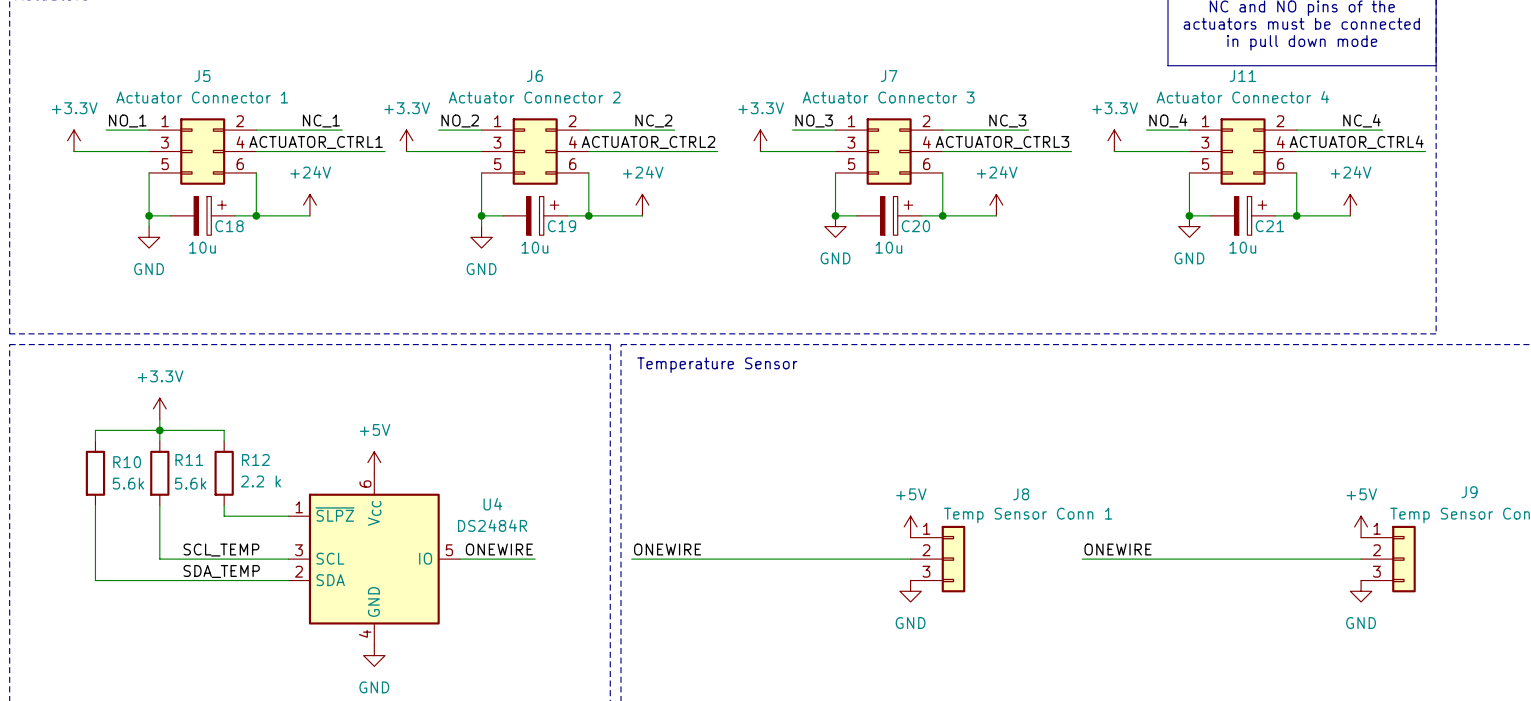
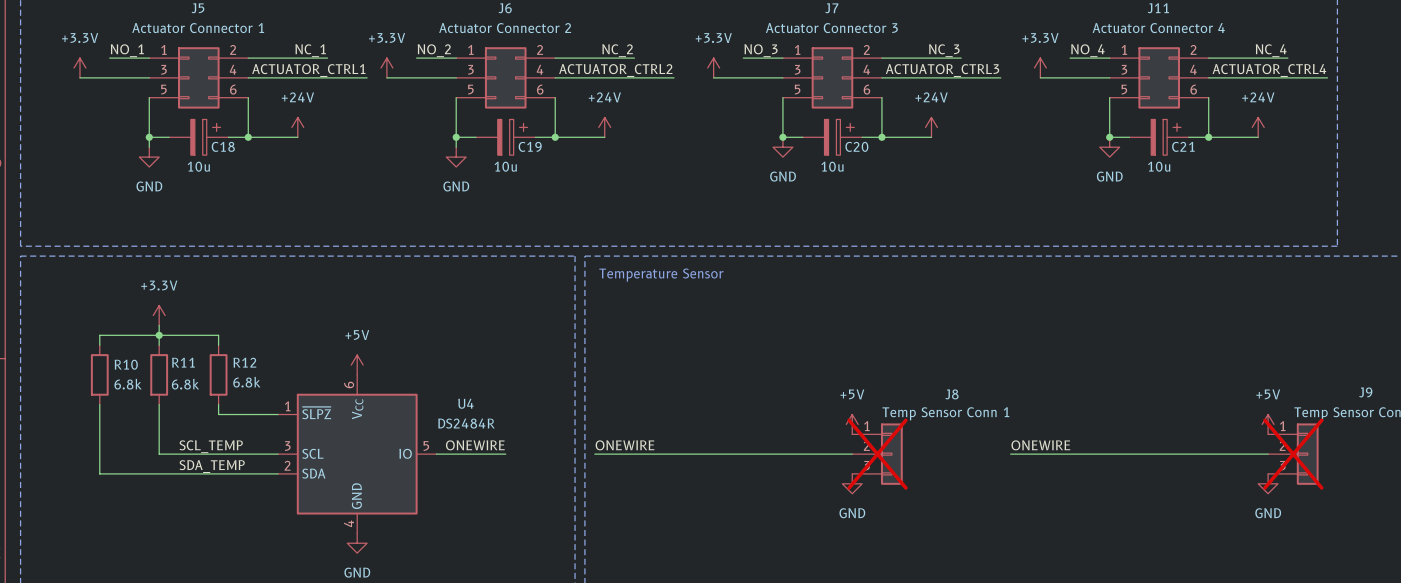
R12 value: 2.2 k (260, 481) -> 6.8k (246, 382)
R10 value: 5.6k (128, 483) -> 6.8k (128, 384)
R11 value: 5.6k (190, 483) -> 6.8k (185, 384)
J8 do-not-place cross: none -> (877, 454)
J9 do-not-place cross: none -> (1293, 454)

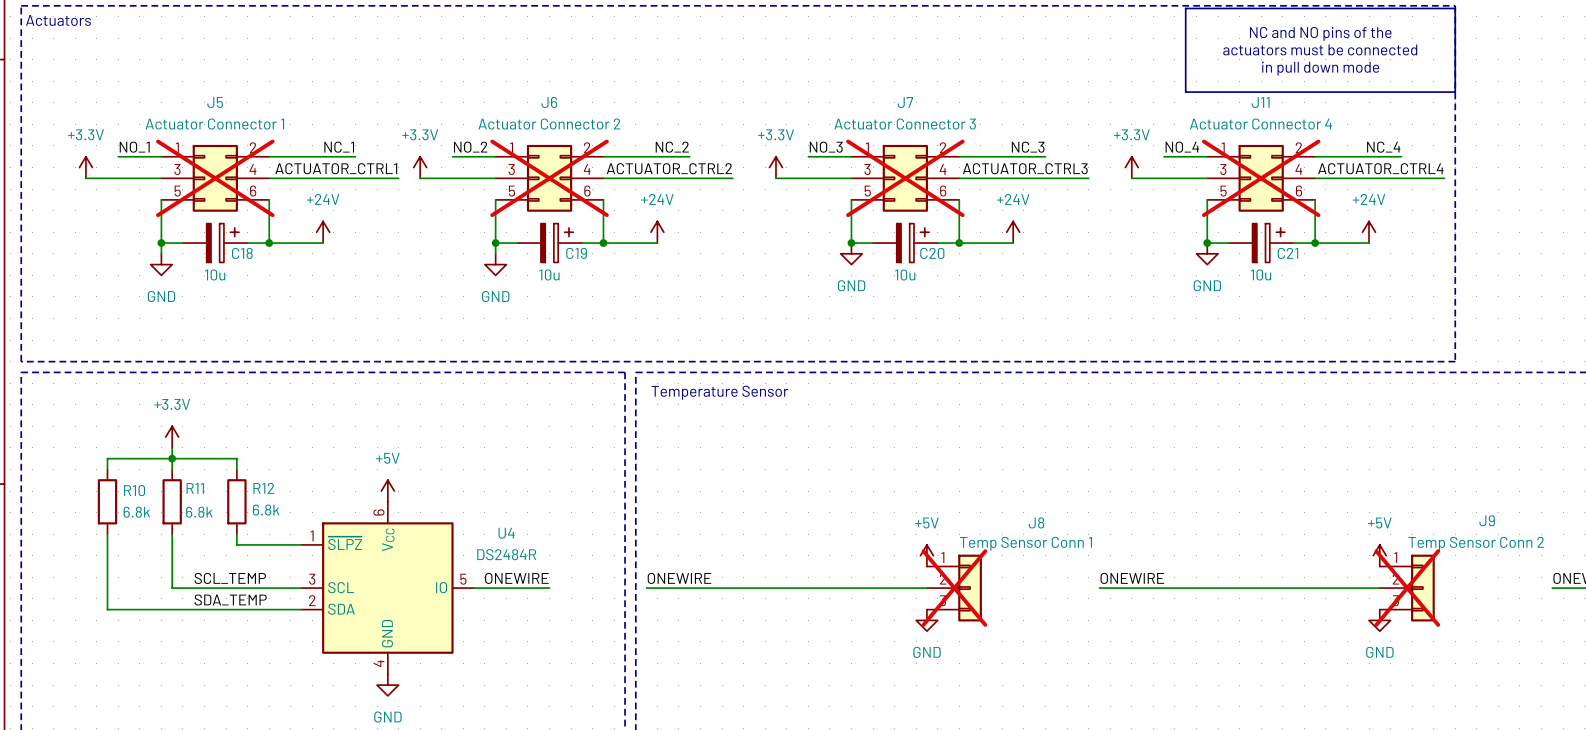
J5 do-not-place cross: none -> (215, 178)
J6 do-not-place cross: none -> (549, 178)
J7 do-not-place cross: none -> (905, 178)
J11 do-not-place cross: none -> (1261, 178)

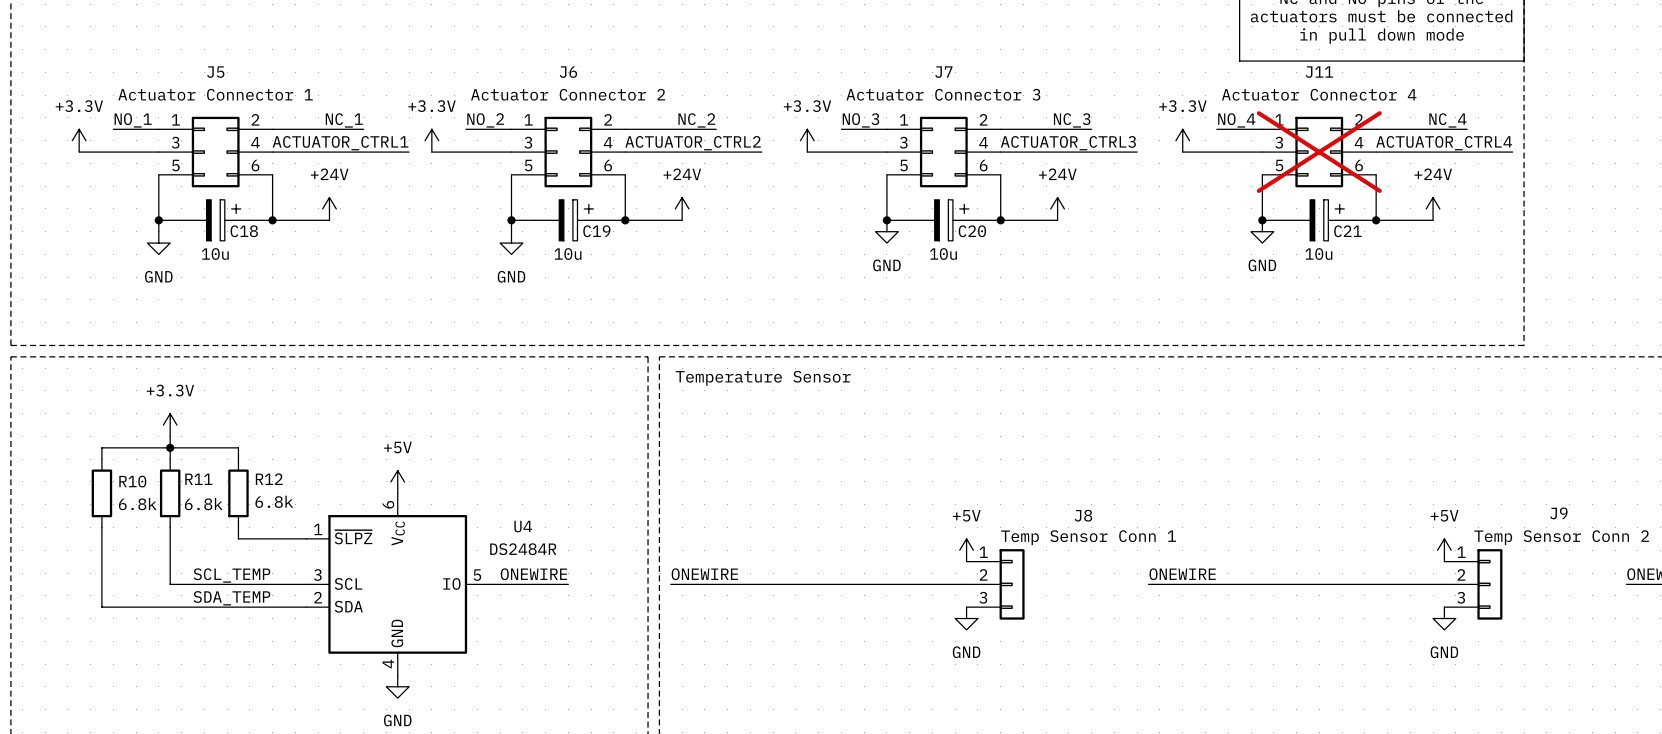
J5 do-not-place cross: (215, 178) -> none
J6 do-not-place cross: (549, 178) -> none
J7 do-not-place cross: (905, 178) -> none
J8 do-not-place cross: (954, 588) -> none
J9 do-not-place cross: (1407, 588) -> none

